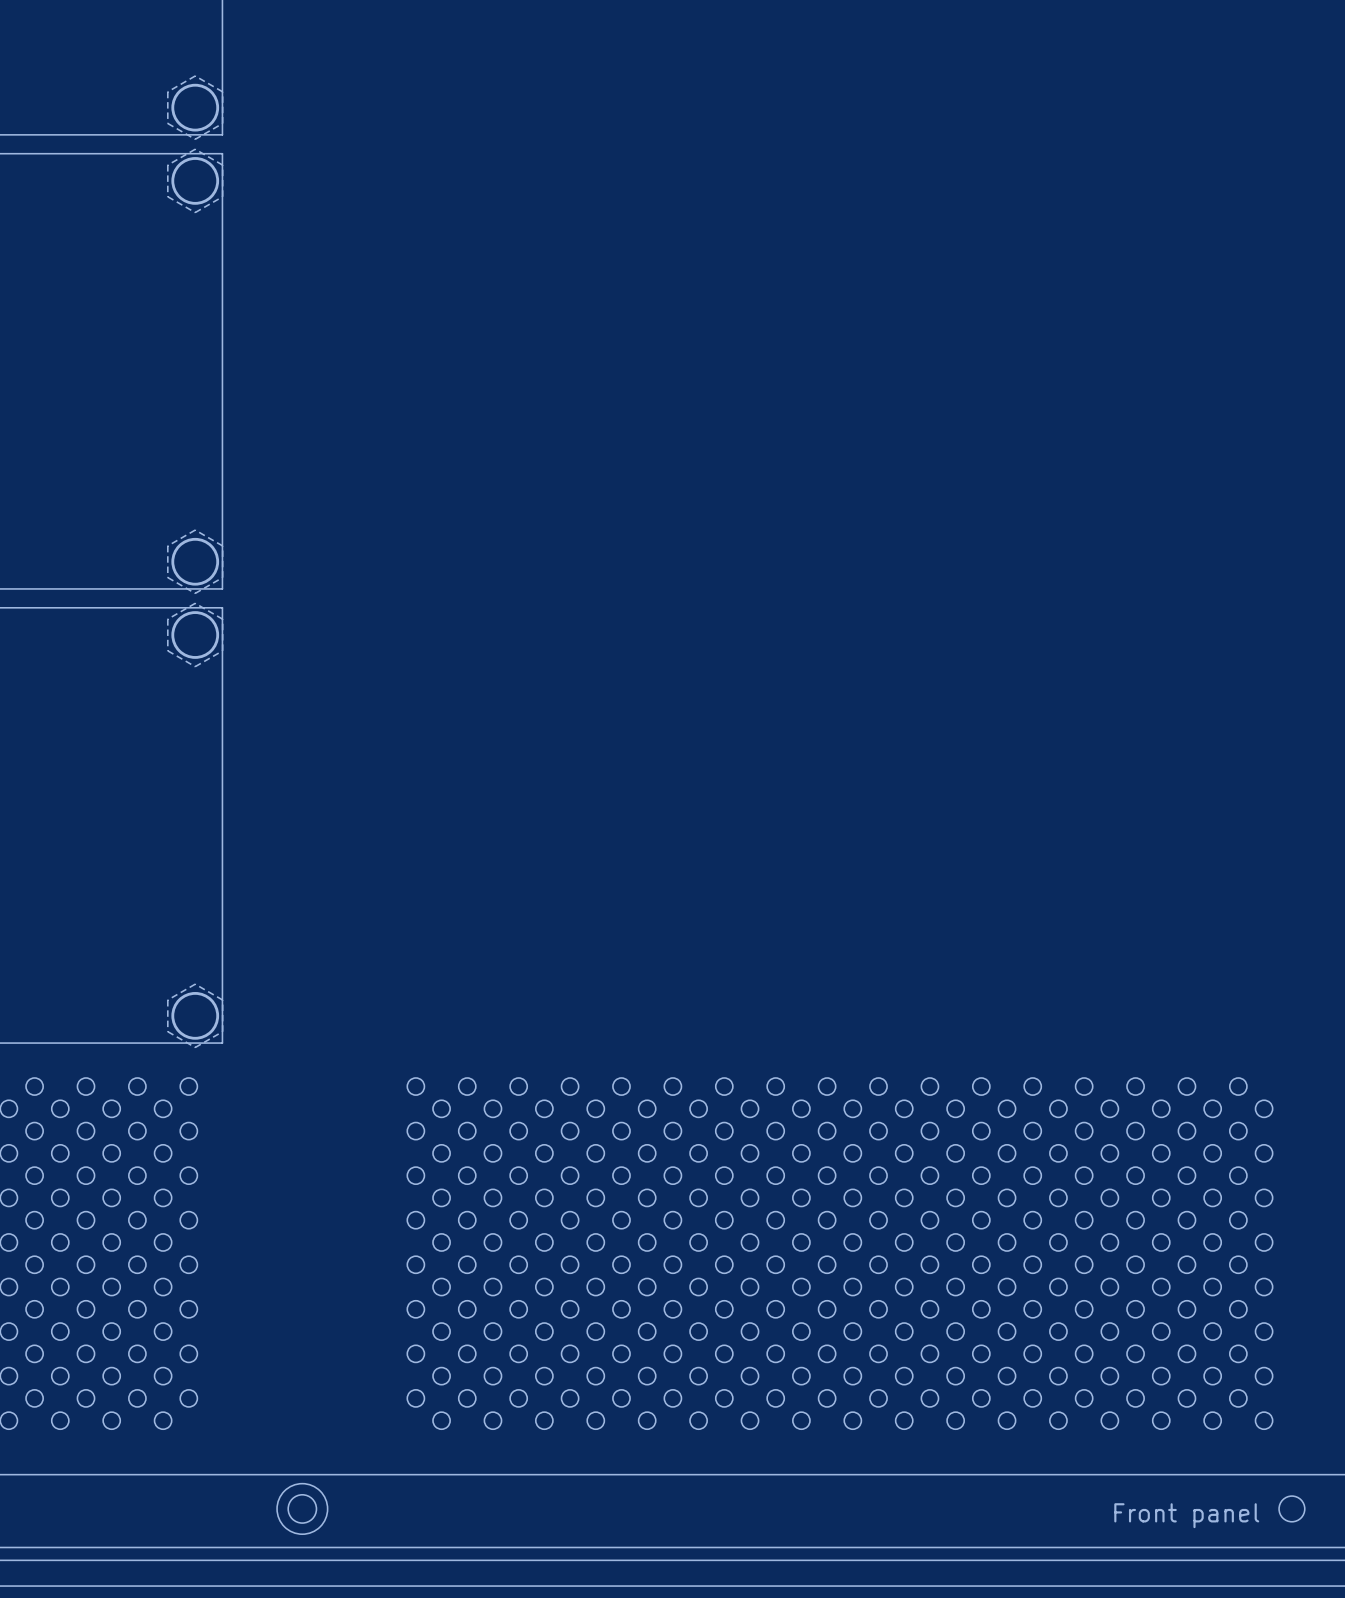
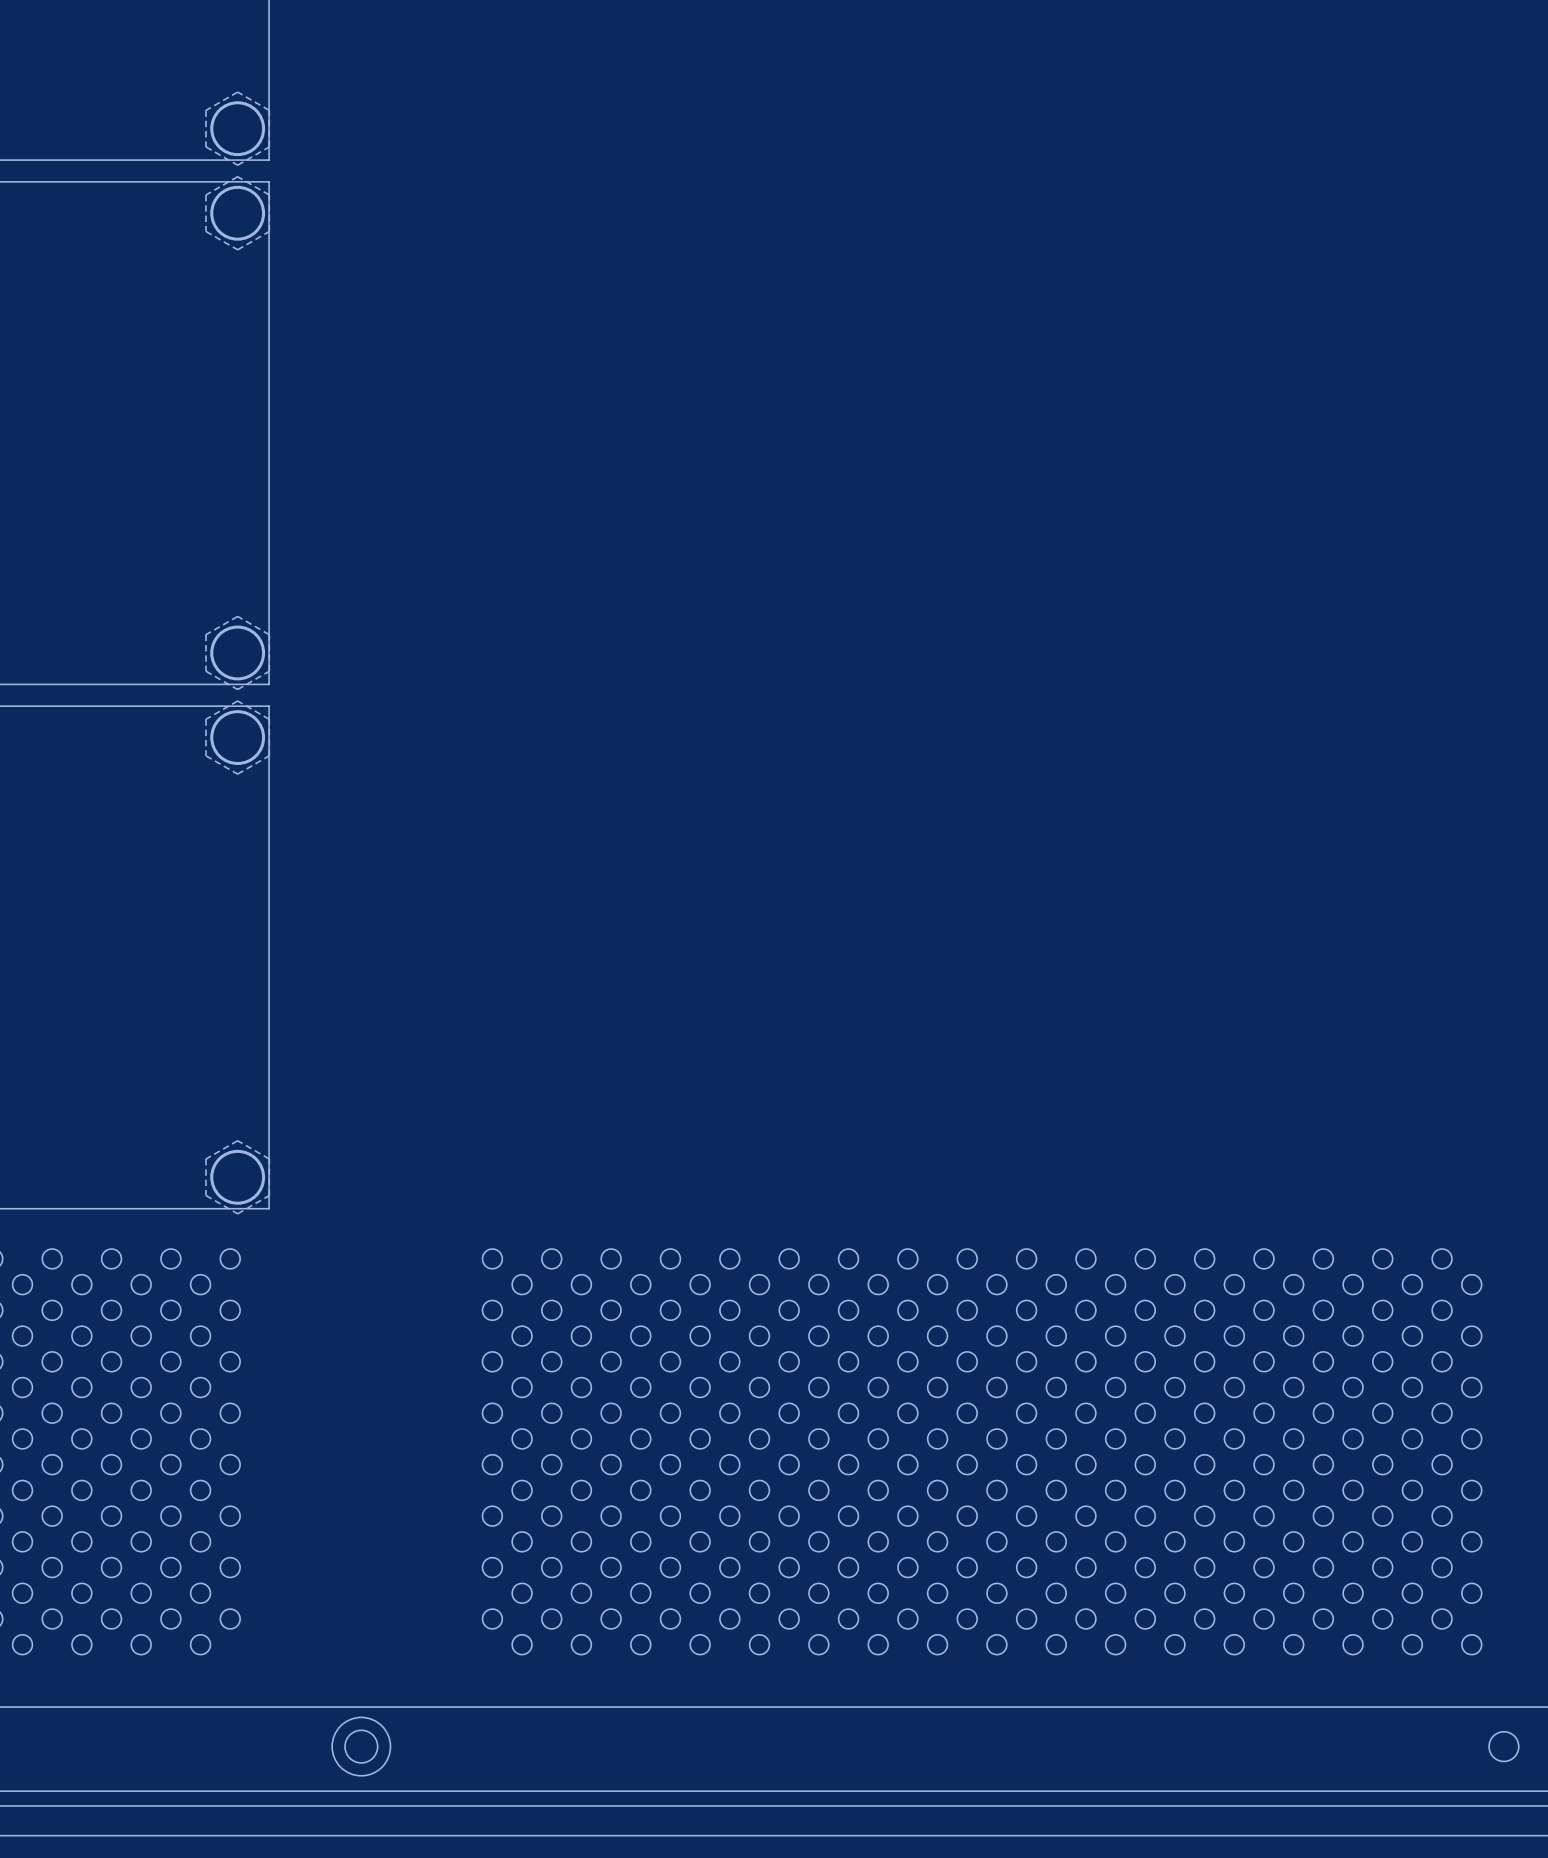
text: Front panel (1186, 1515) -> none

